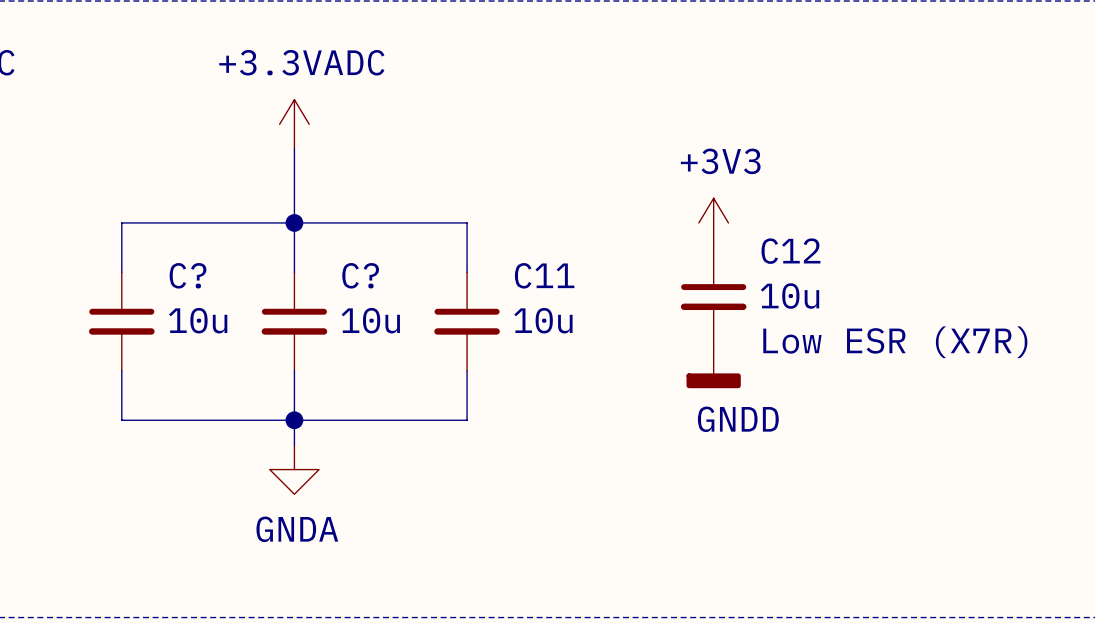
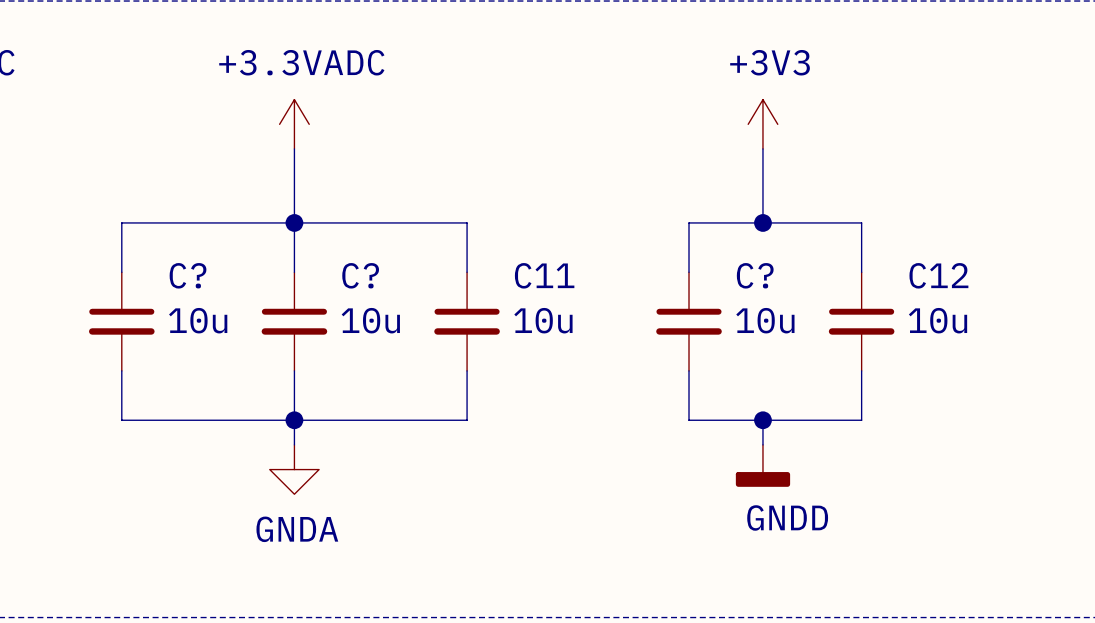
wire: none -> (762, 148) (762, 222)
power symbol position: +3V3 (713, 222) -> +3V3 (762, 124)
junction: none -> (762, 222)
wire: none -> (689, 272) (689, 222) (861, 222) (861, 272)
C12 position: (713, 296) -> (861, 321)
C?: none -> 10u (689, 321)
C12 text: Low ESR (X7R) (895, 342) -> none
power symbol position: GNDD (713, 367) -> GNDD (762, 465)
wire: none -> (689, 370) (689, 420) (861, 420) (861, 370)
wire: none -> (762, 420) (762, 444)
junction: none -> (762, 420)

